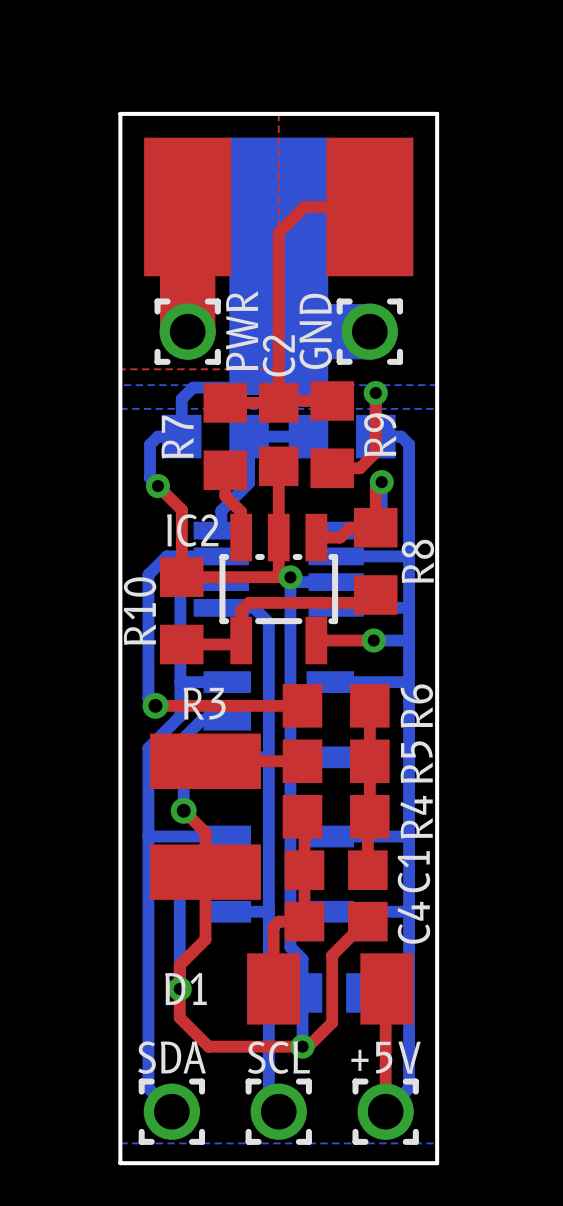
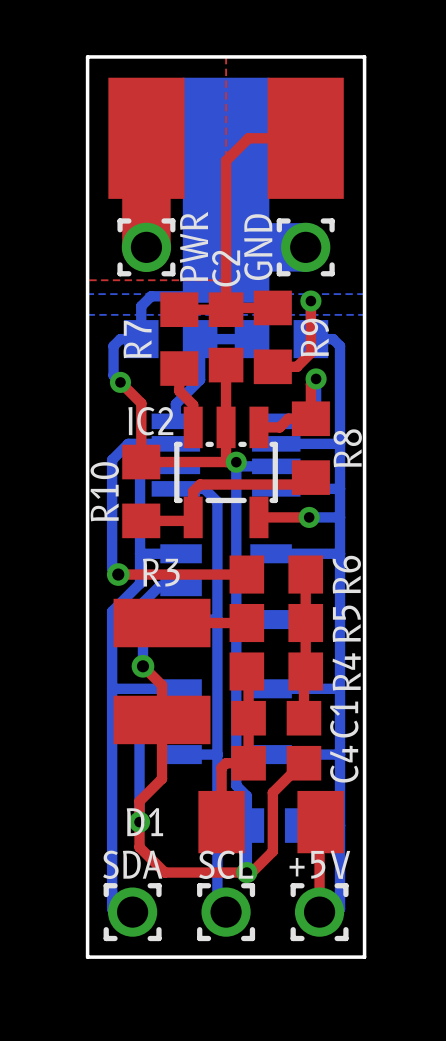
SDA position: (171, 1111) -> (132, 912)
SCL position: (278, 1111) -> (226, 912)
+5V position: (385, 1111) -> (319, 912)
board edge: (120, 1143) (120, 1163) (437, 1163) (437, 1143) -> (87, 957) (364, 957)

